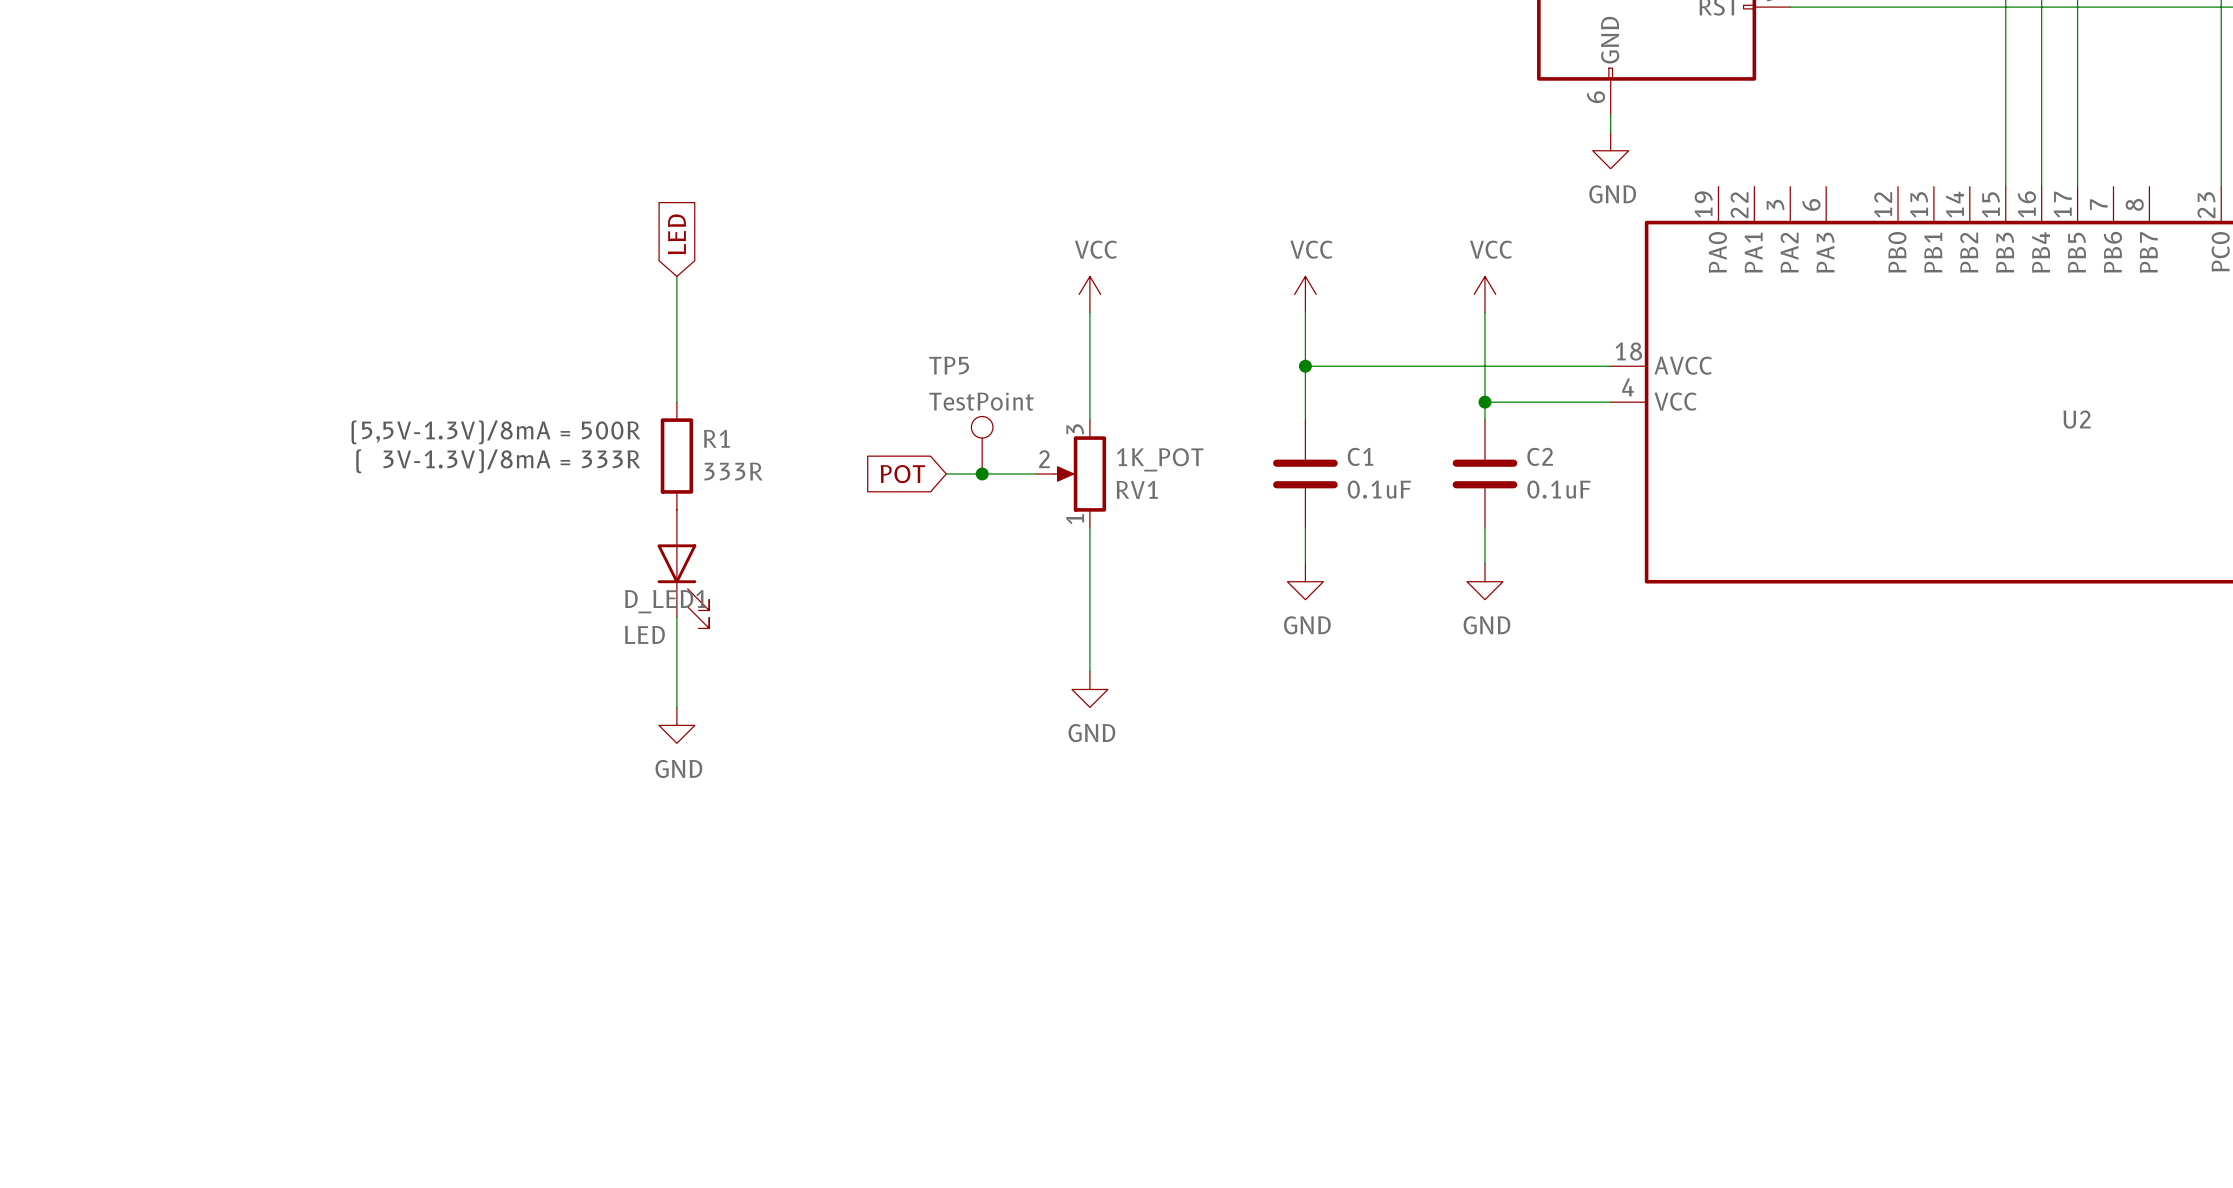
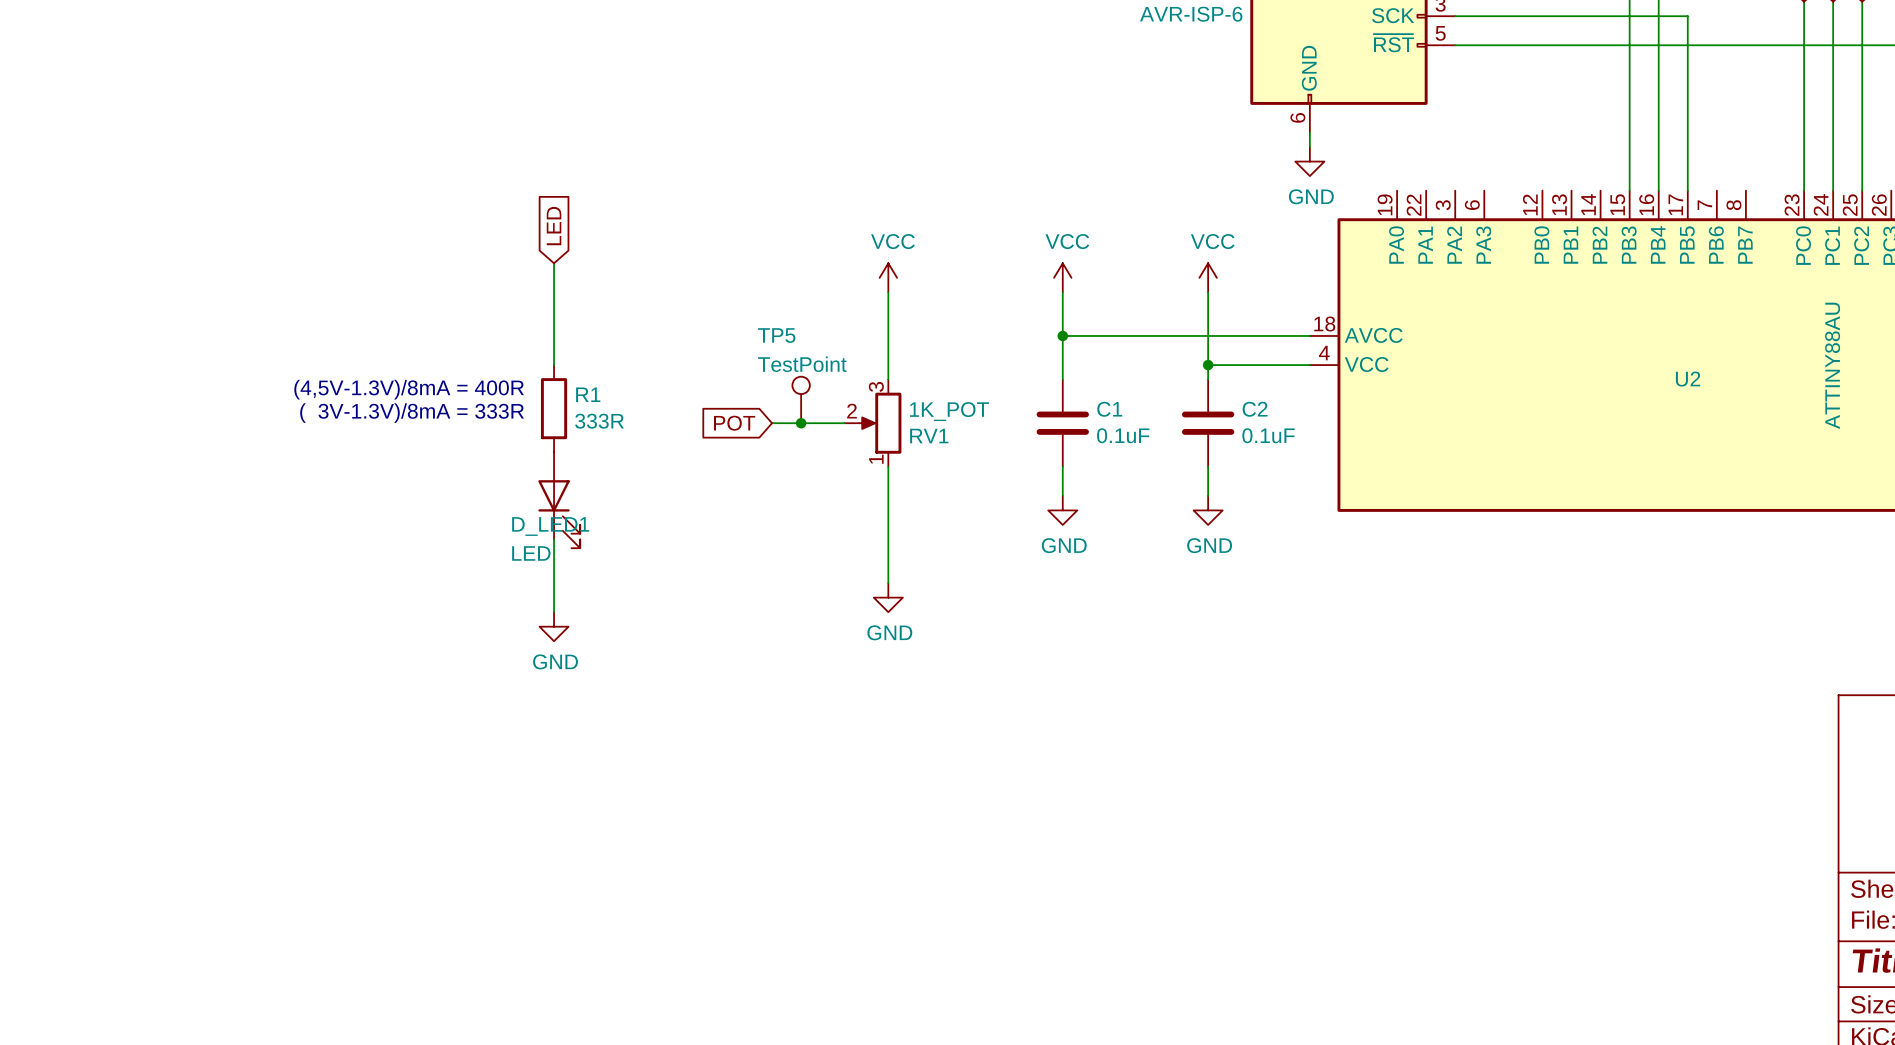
text: (5,5V-1.3V)/8mA = 500R (495, 432) -> (4,5V-1.3V)/8mA = 400R (409, 389)

